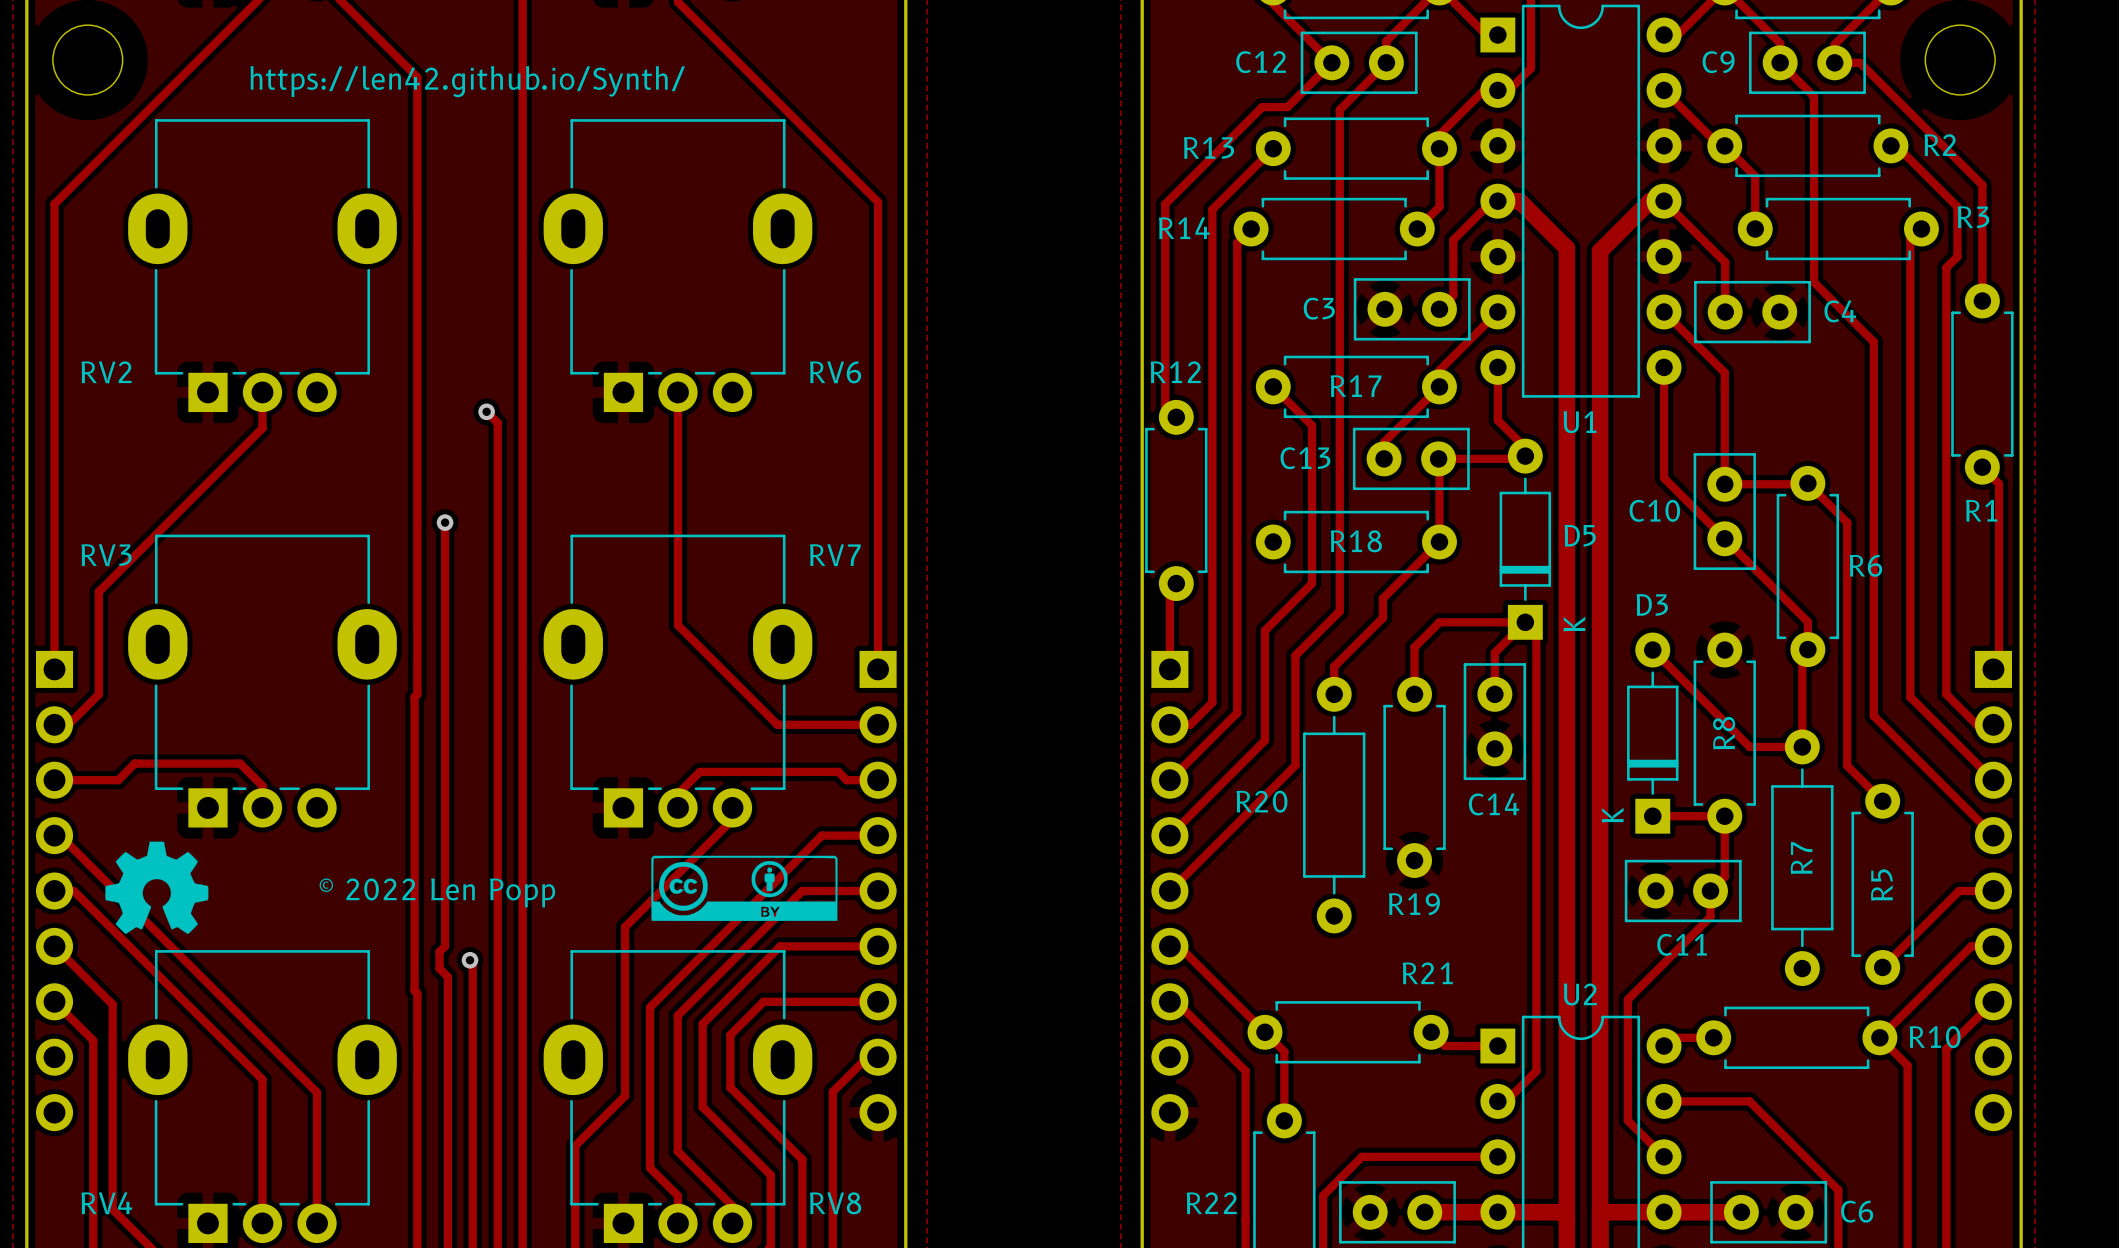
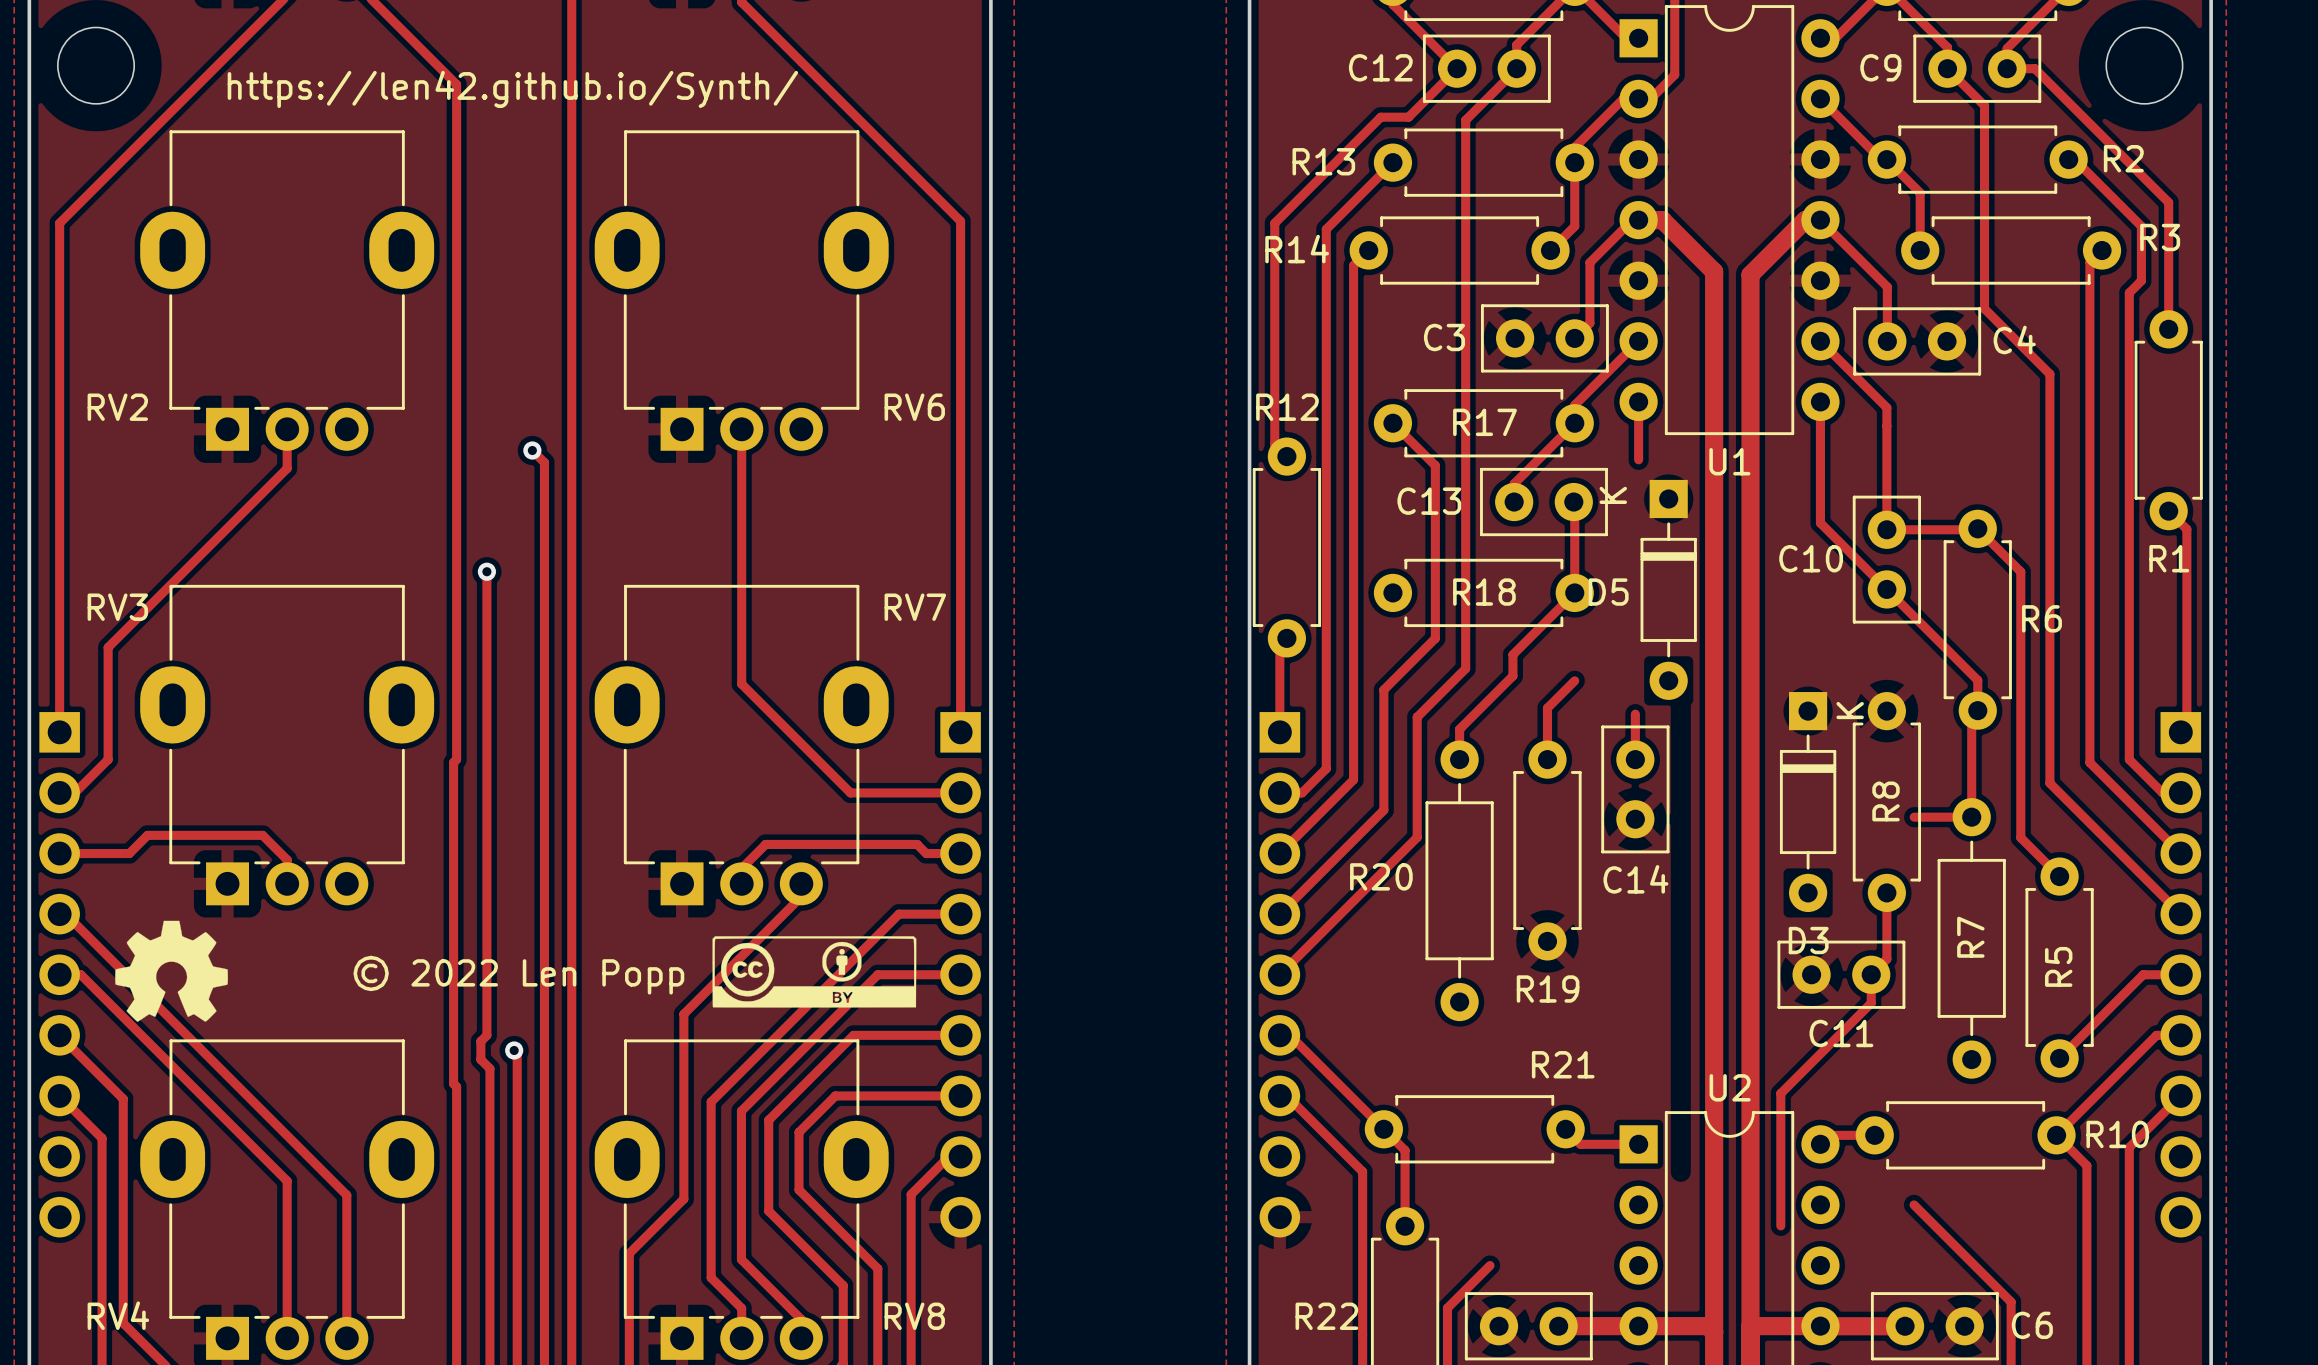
track: (1497, 420) (1525, 447) -> none
track: (1438, 458) (1522, 458) -> none
D5 rotation: 0° (1525, 539) -> 180° (1668, 589)
track: (1439, 622) (1525, 622) (1494, 652) -> none
track: (1536, 633) (1536, 1071) (1506, 1101) -> none
track: (1652, 650) (1749, 746) -> none
D3 rotation: 0° (1652, 733) -> 180° (1808, 802)
track: (1652, 816) (1724, 816) -> none
track: (1664, 1101) (1749, 1101) -> none
track: (1627, 1120) (1664, 1156) -> none
track: (1362, 1156) (1497, 1156) -> none

